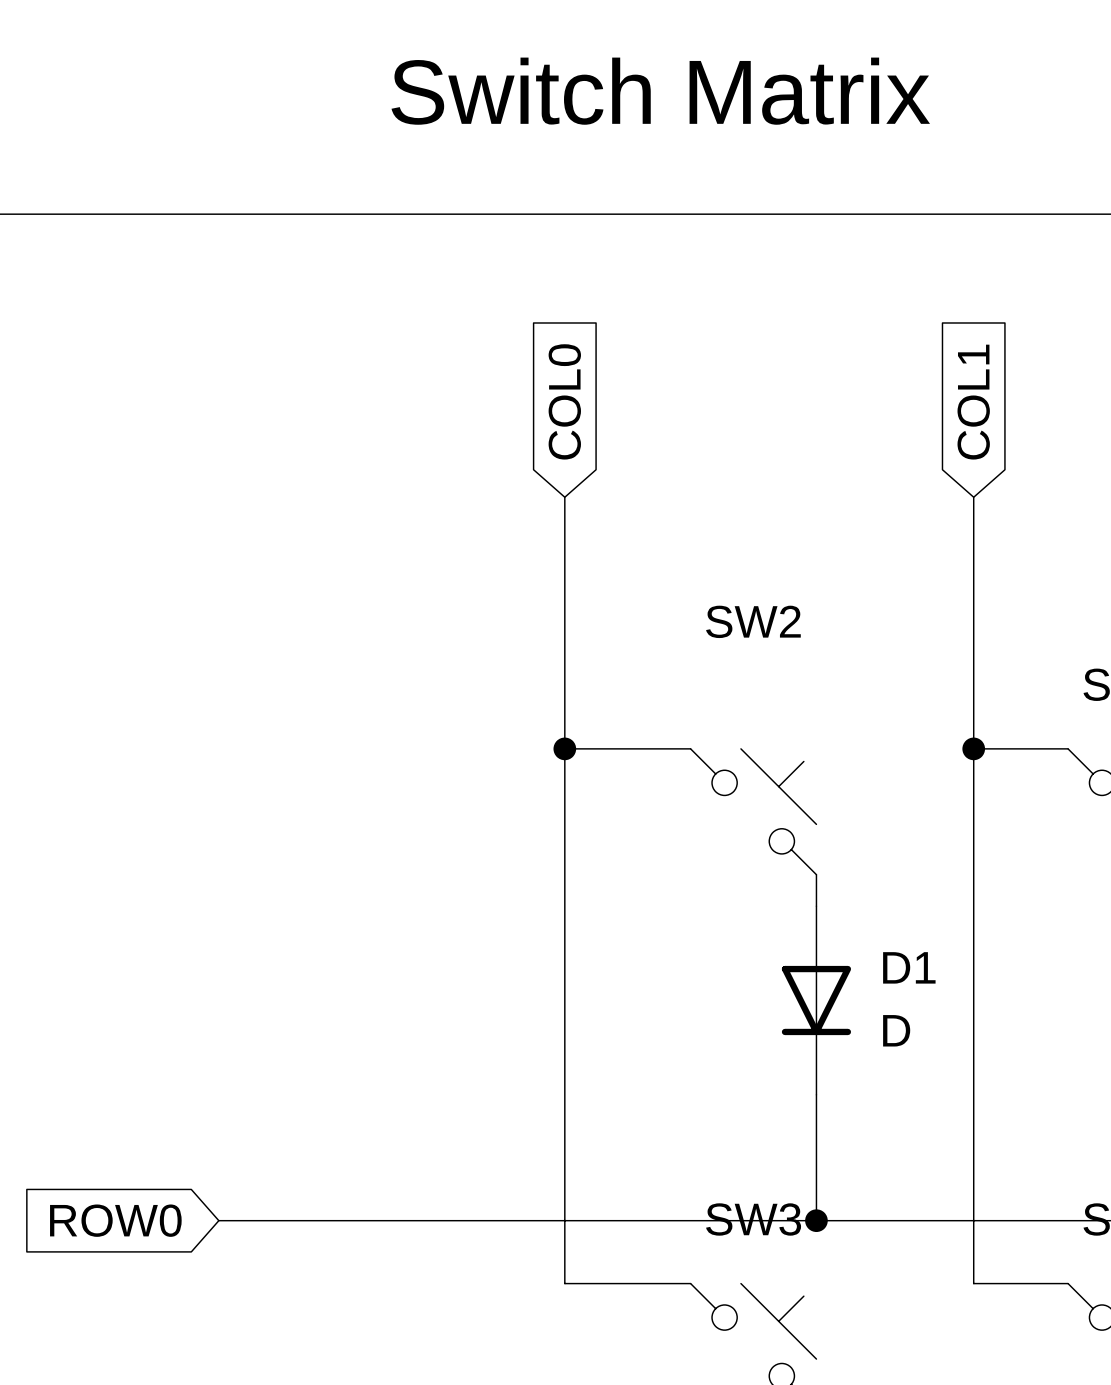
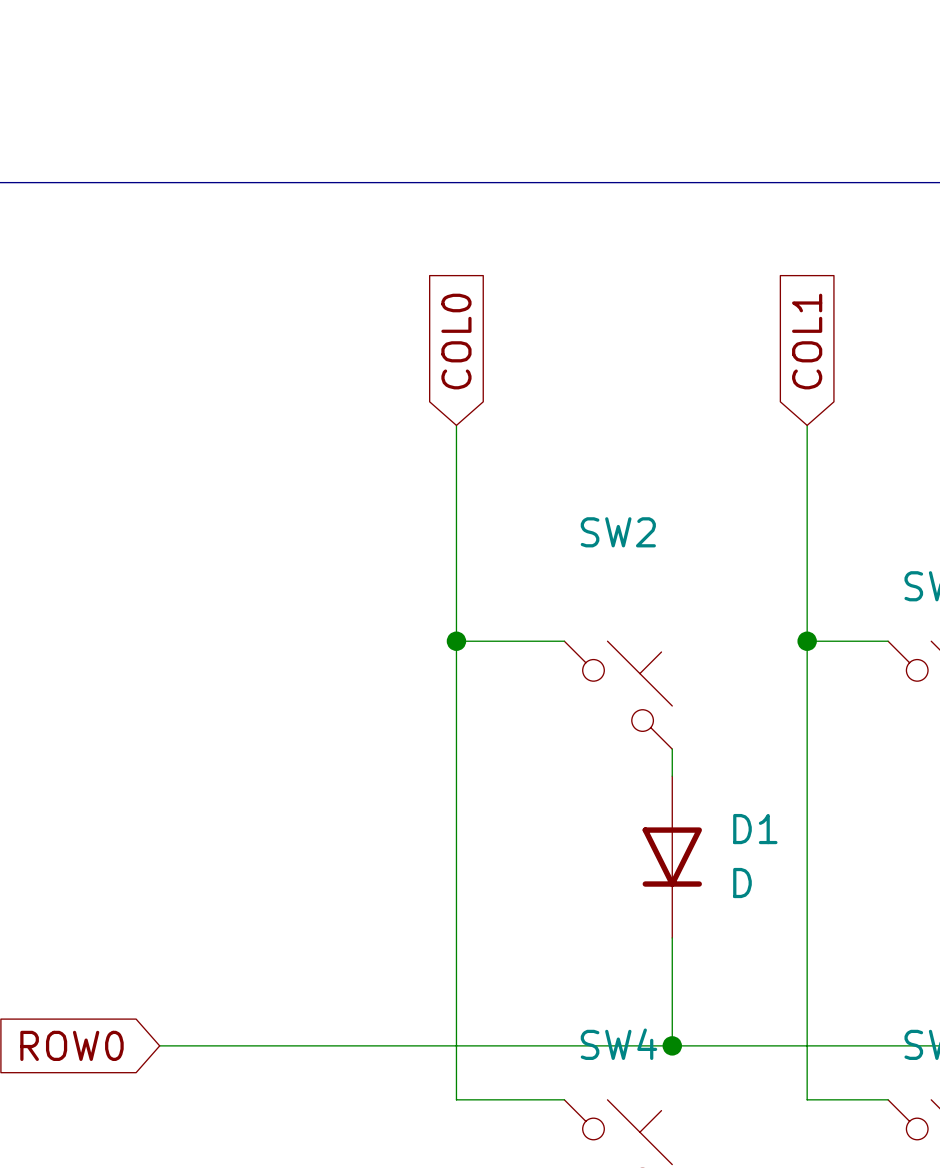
text: Switch Matrix (660, 91) -> none
SW3 name: SW3 (753, 1219) -> SW4 (618, 1044)

